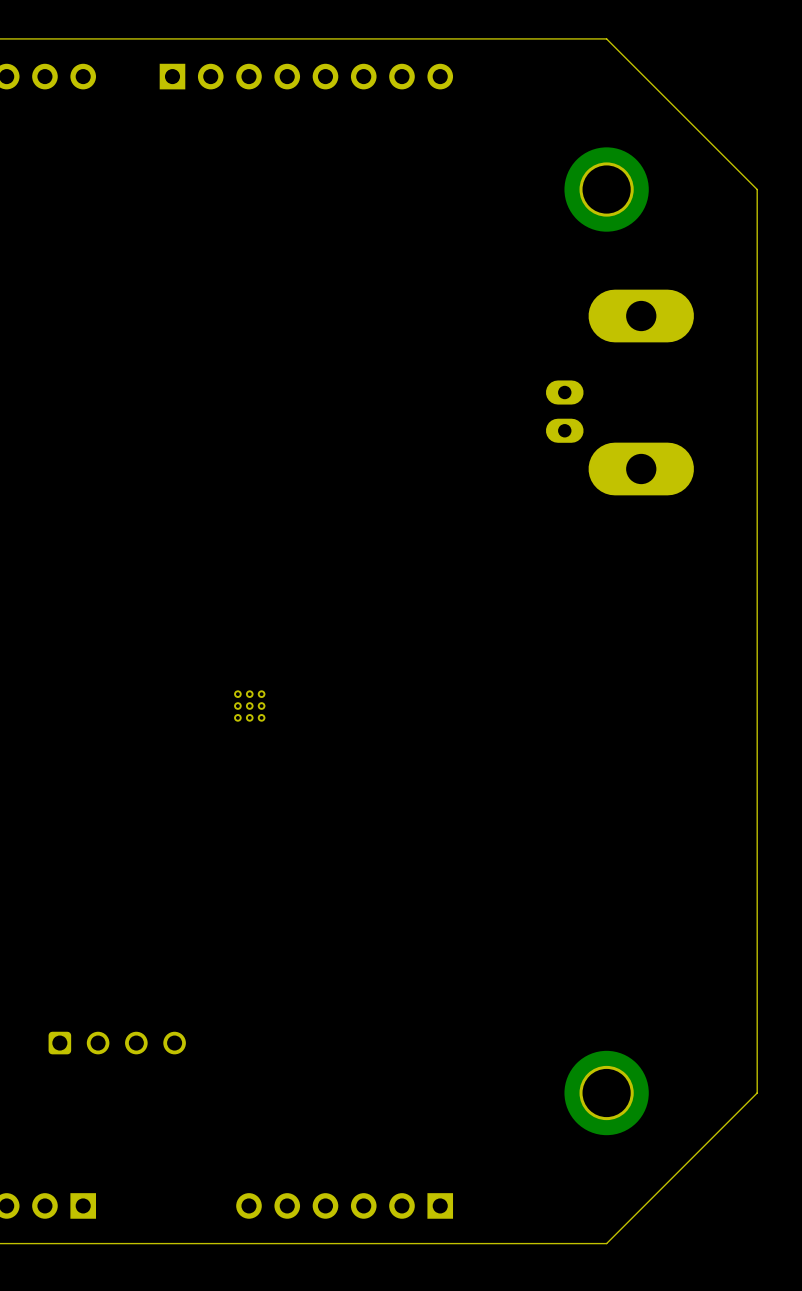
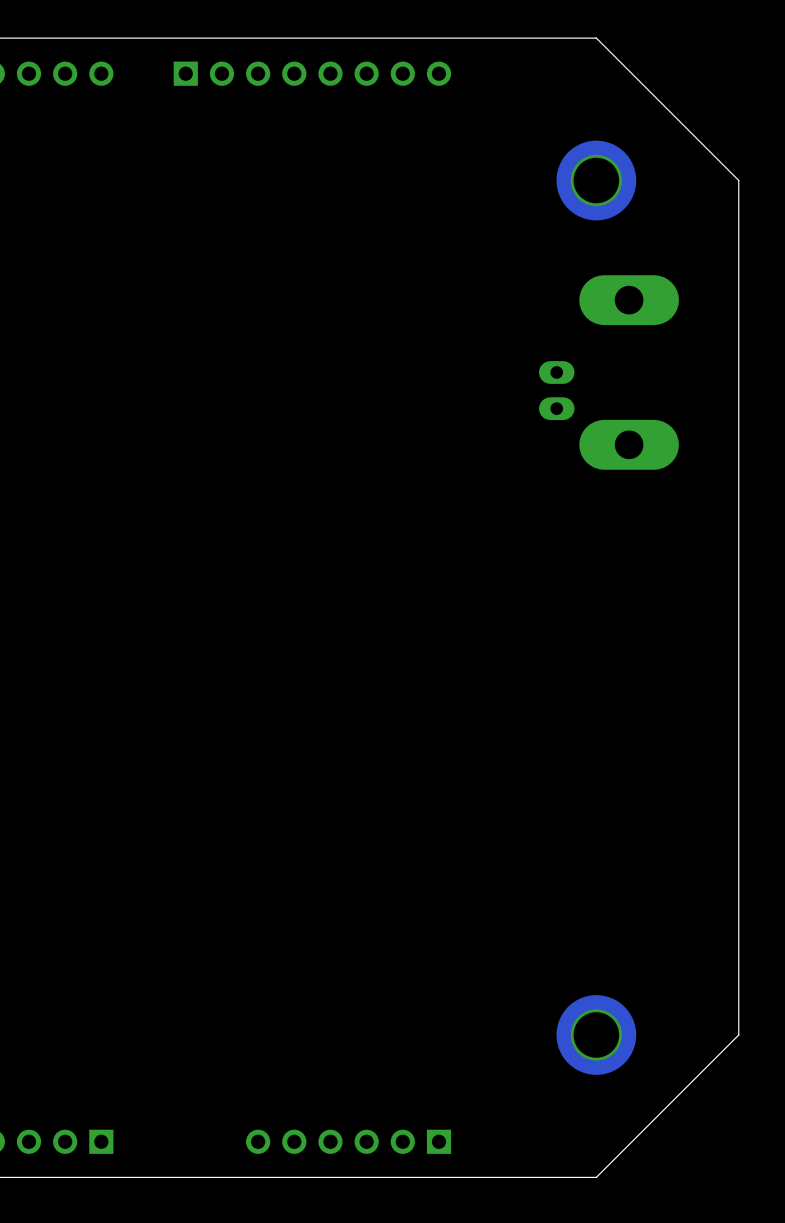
part: (249, 706) -> none
part: (117, 1043) -> none

